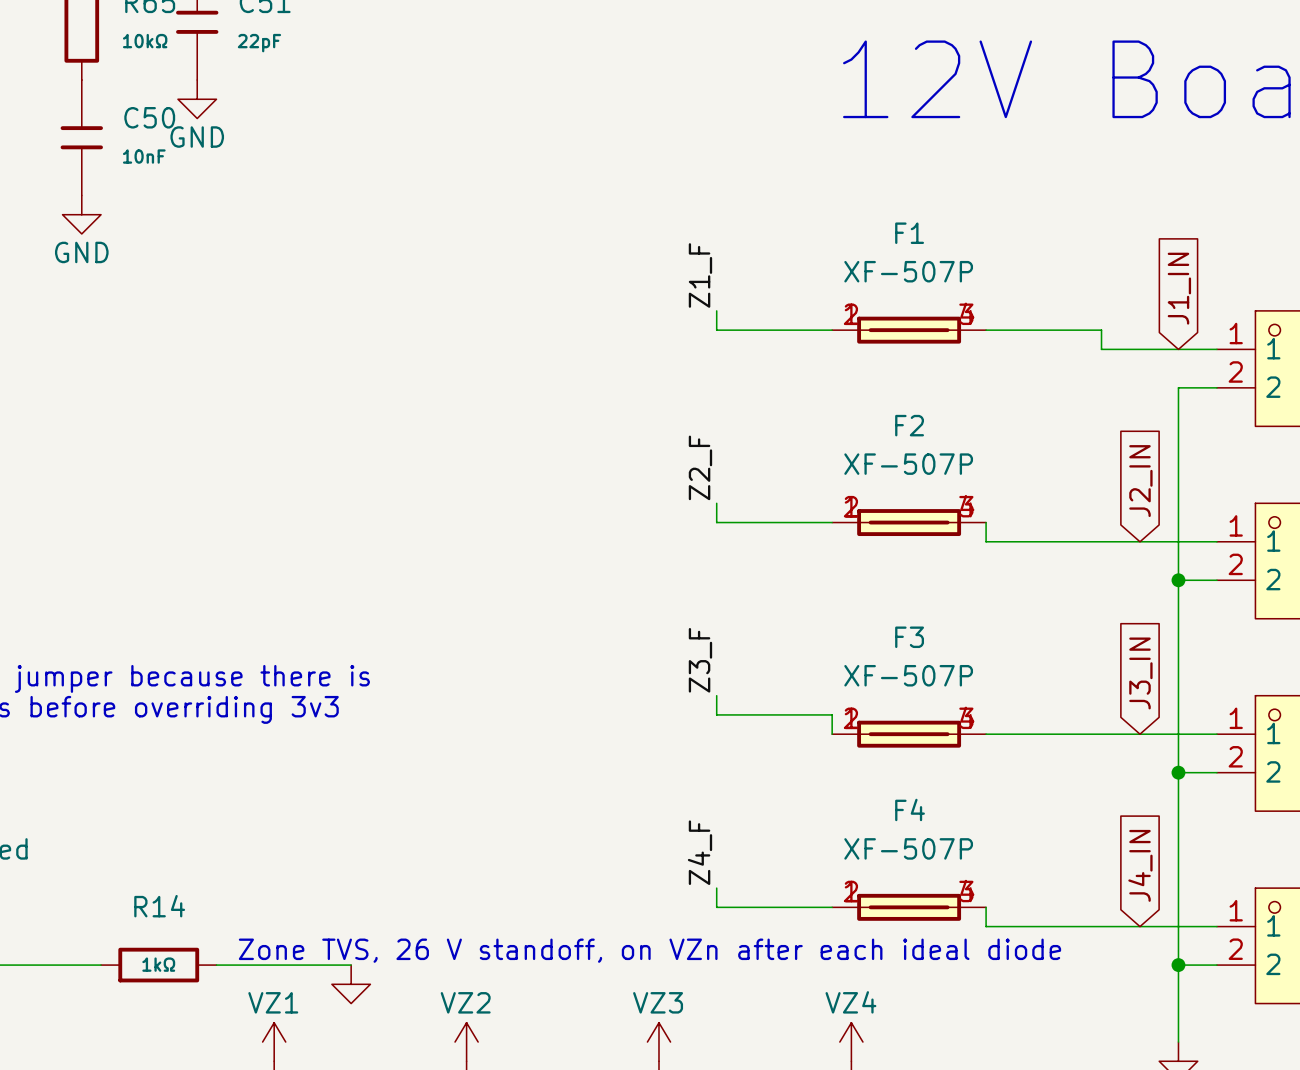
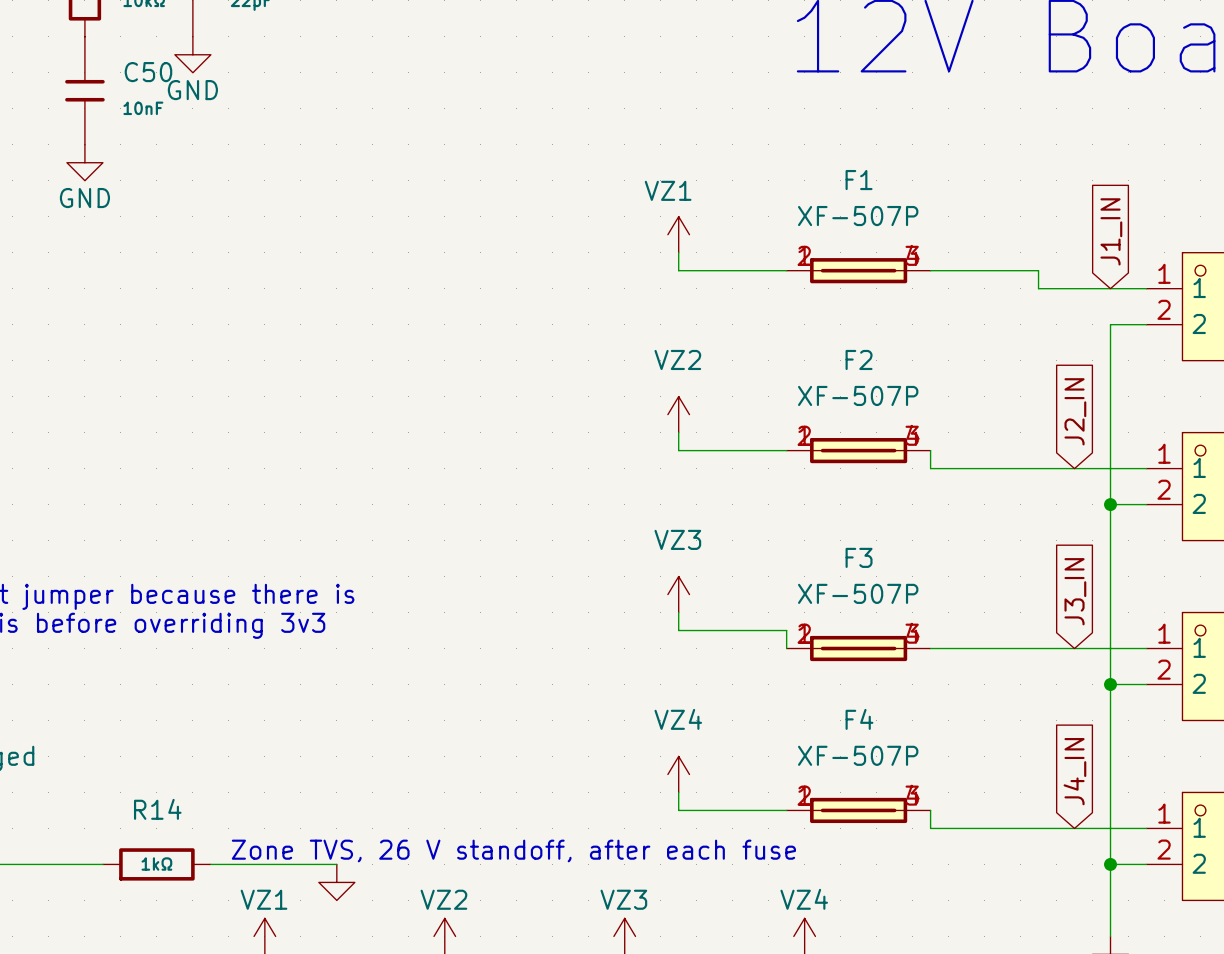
label: Z1_F (700, 275) -> none
power symbol: none -> VZ1 (678, 234)
label: Z2_F (700, 467) -> none
power symbol: none -> VZ2 (678, 414)
label: Z3_F (700, 660) -> none
power symbol: none -> VZ3 (678, 594)
label: Z4_F (700, 852) -> none
power symbol: none -> VZ4 (678, 774)
text: Zone TVS, 26 V standoff, on VZn after each ideal diode (649, 950) -> Zone TVS, 26 V standoff, after each fuse (513, 850)

